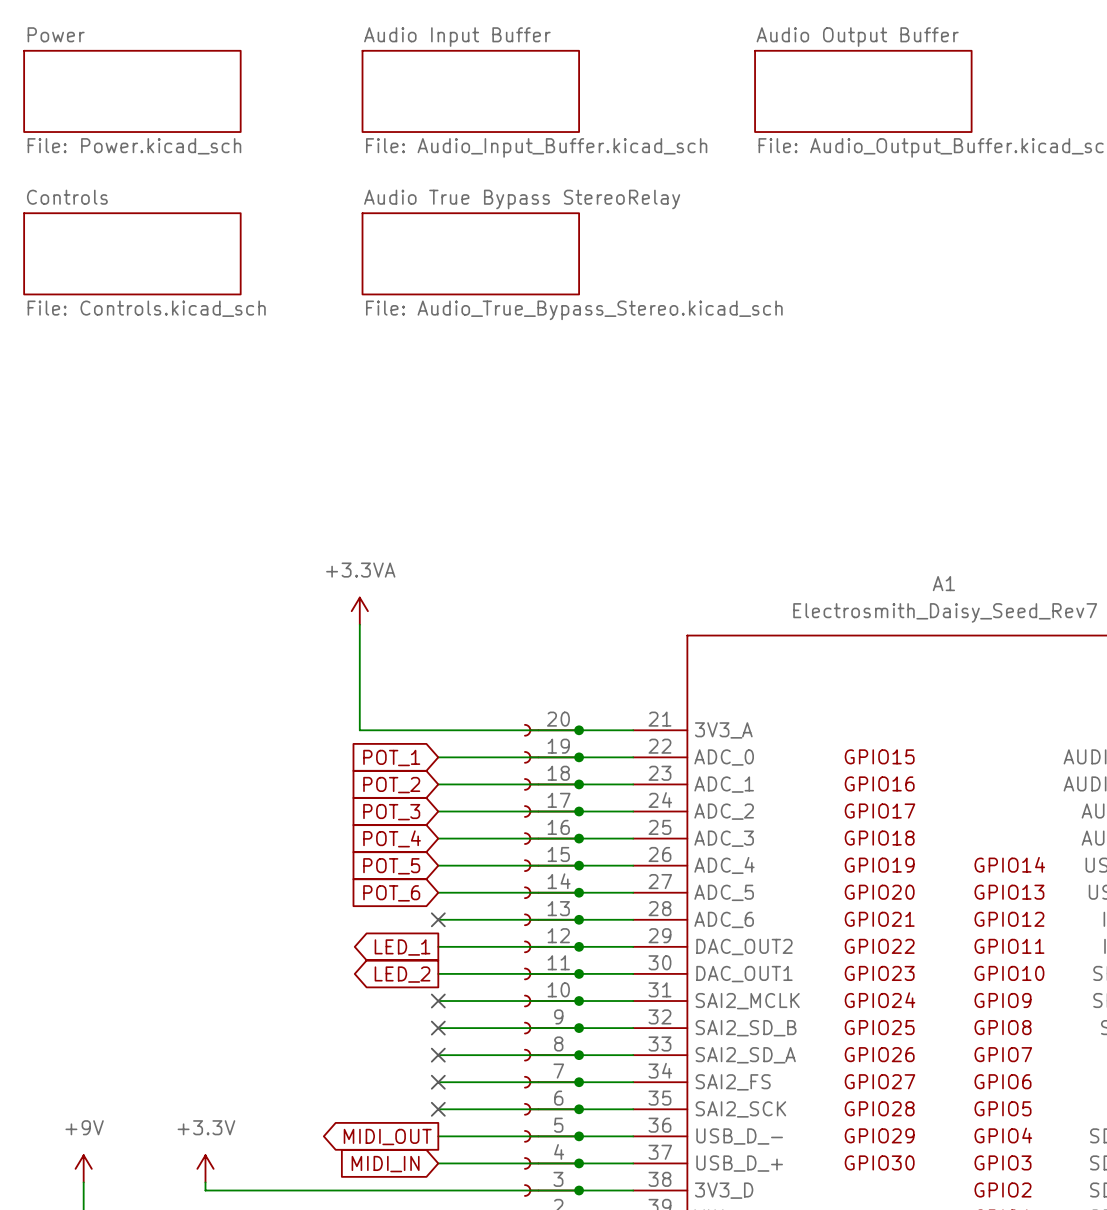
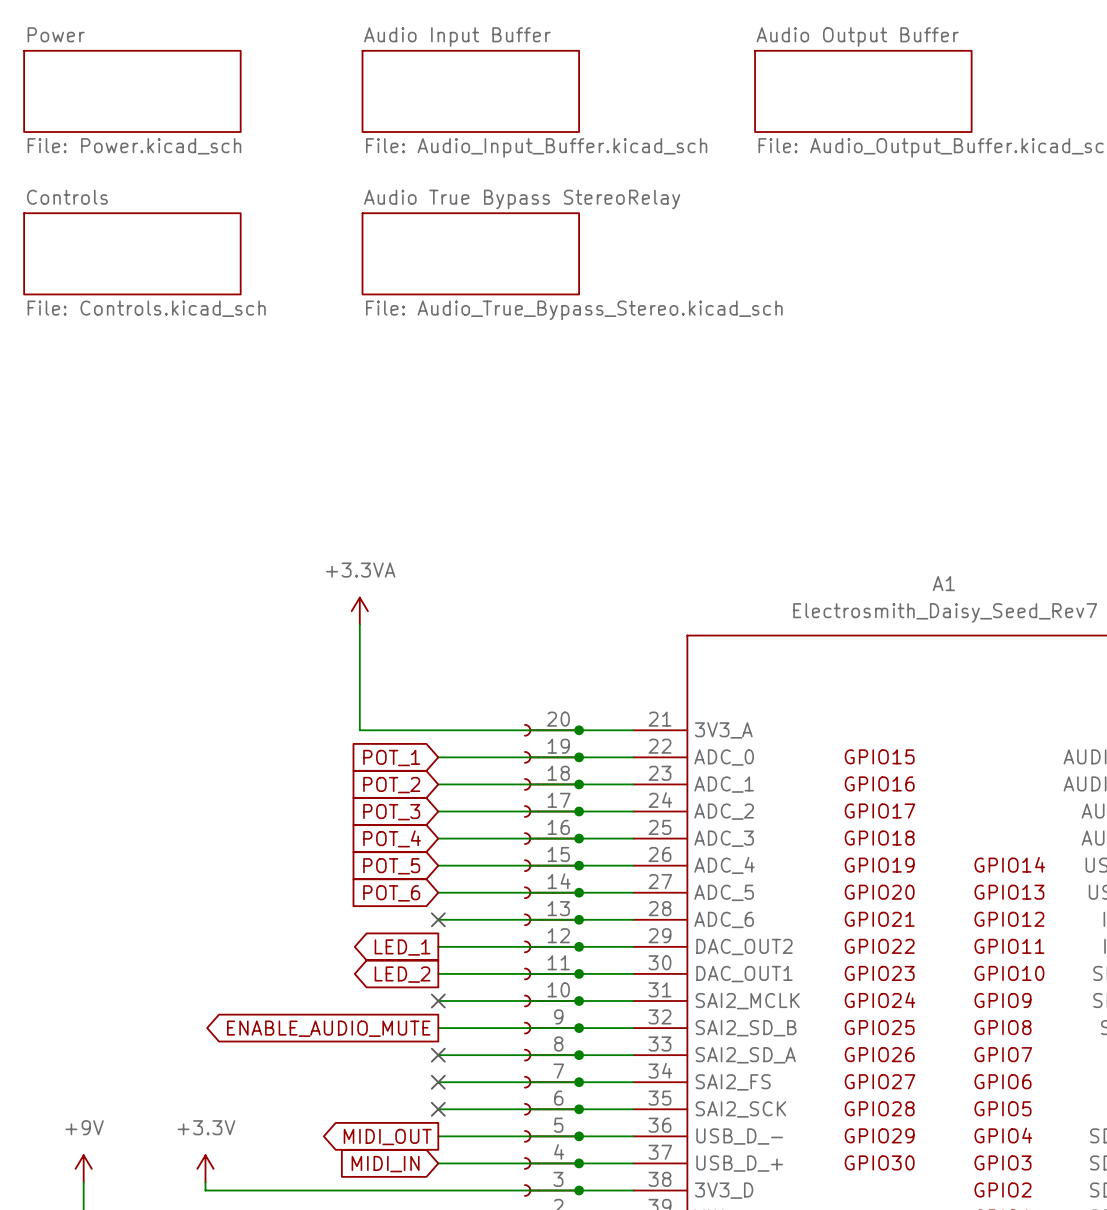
global label: none -> ENABLE_AUDIO_MUTE (328, 1028)
no-connect mark: (438, 1028) -> none

